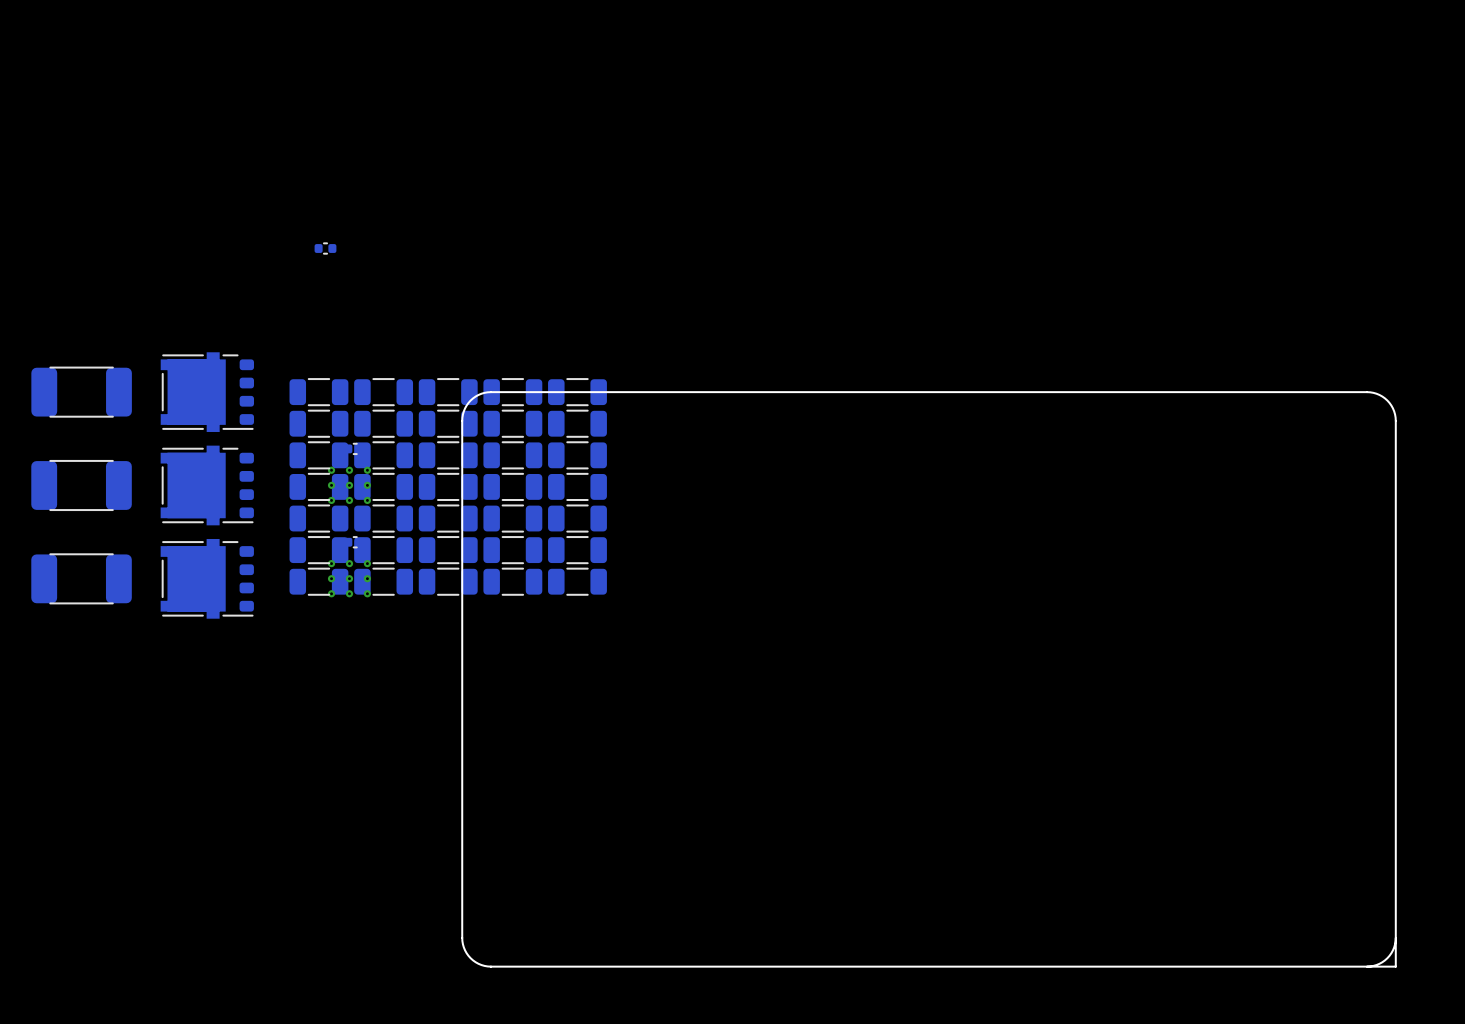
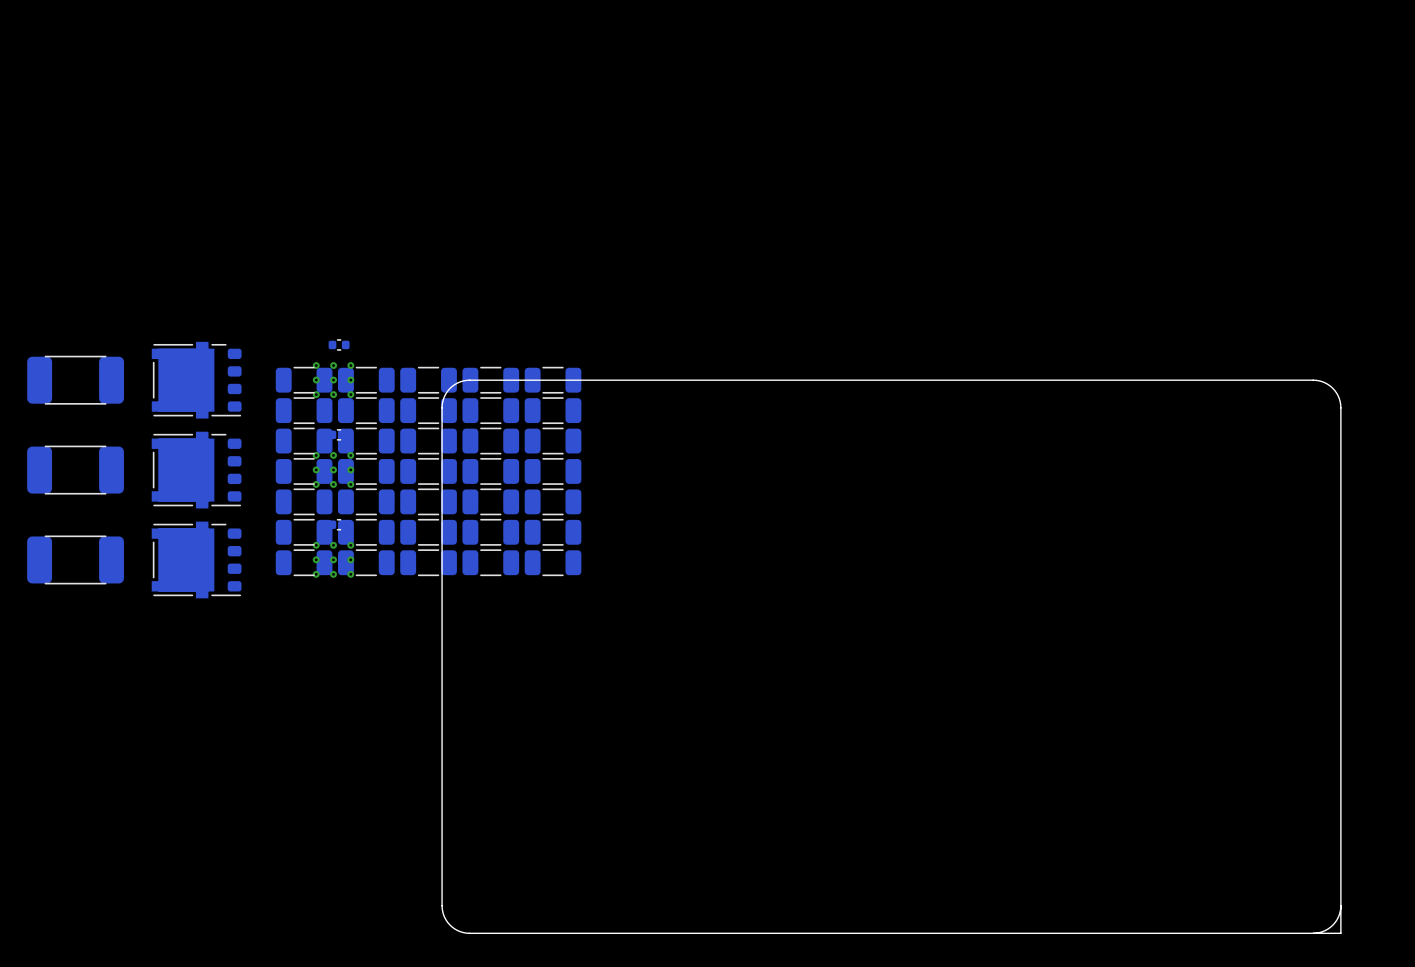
part position: (325, 248) -> (339, 344)
part: none -> (333, 380)

